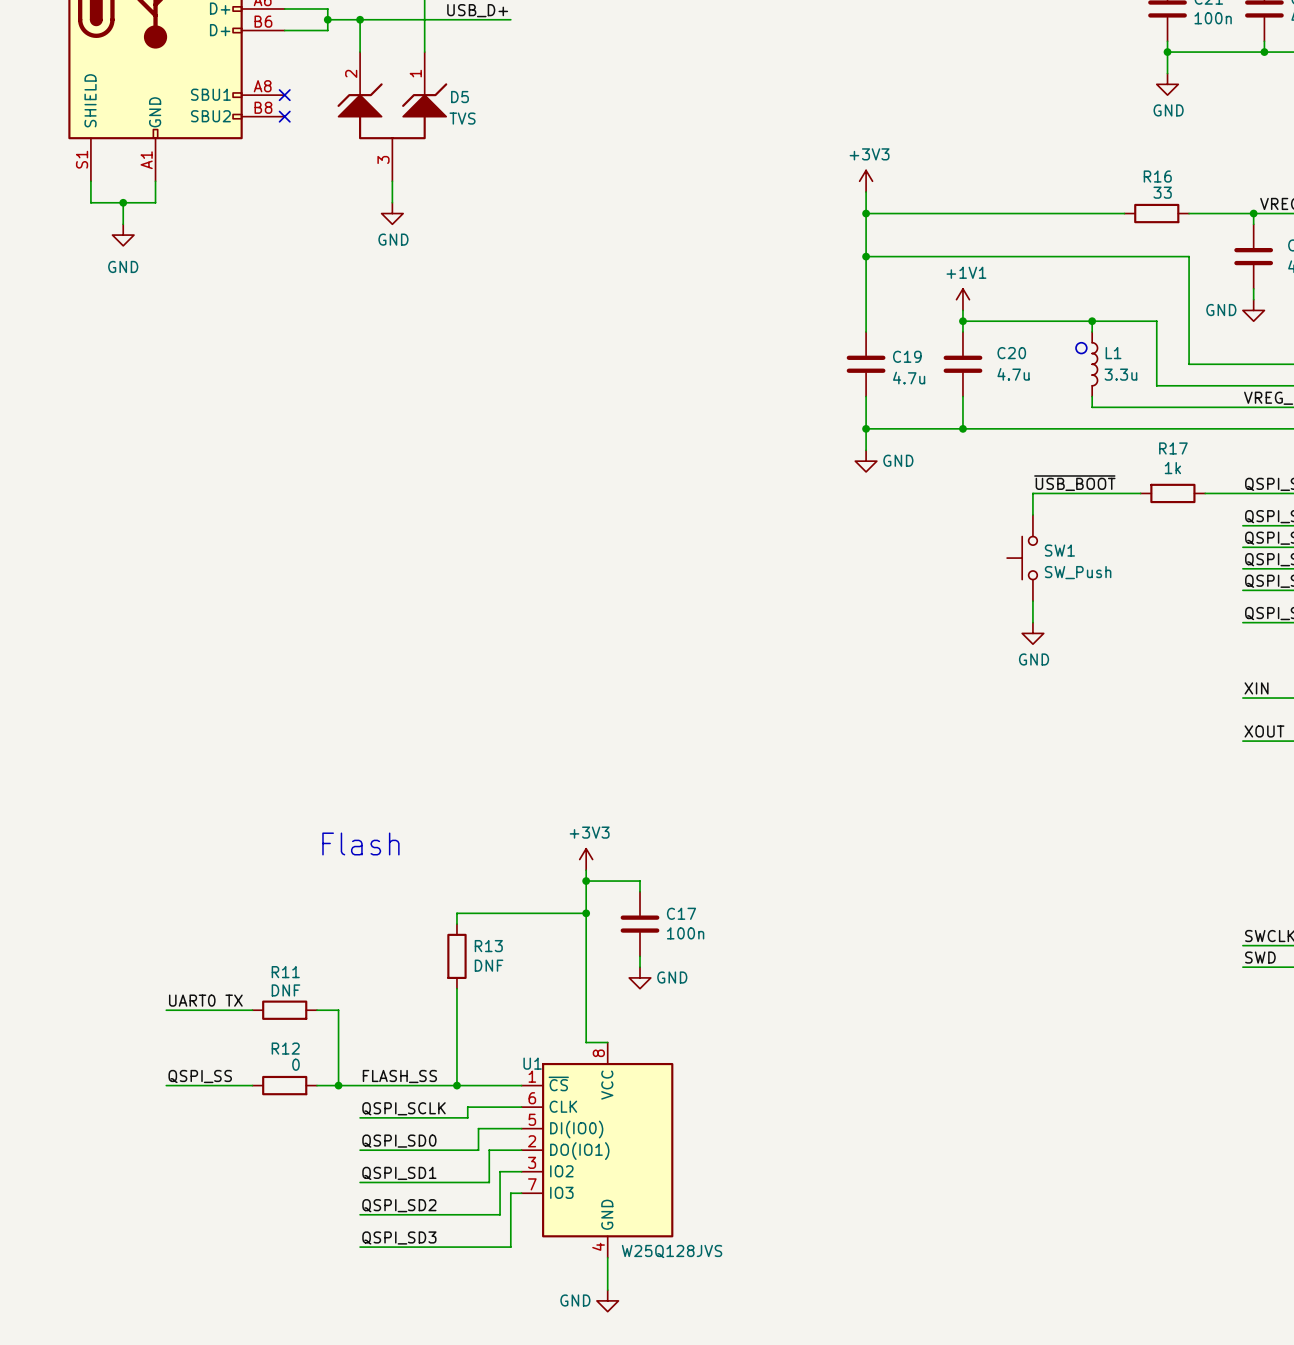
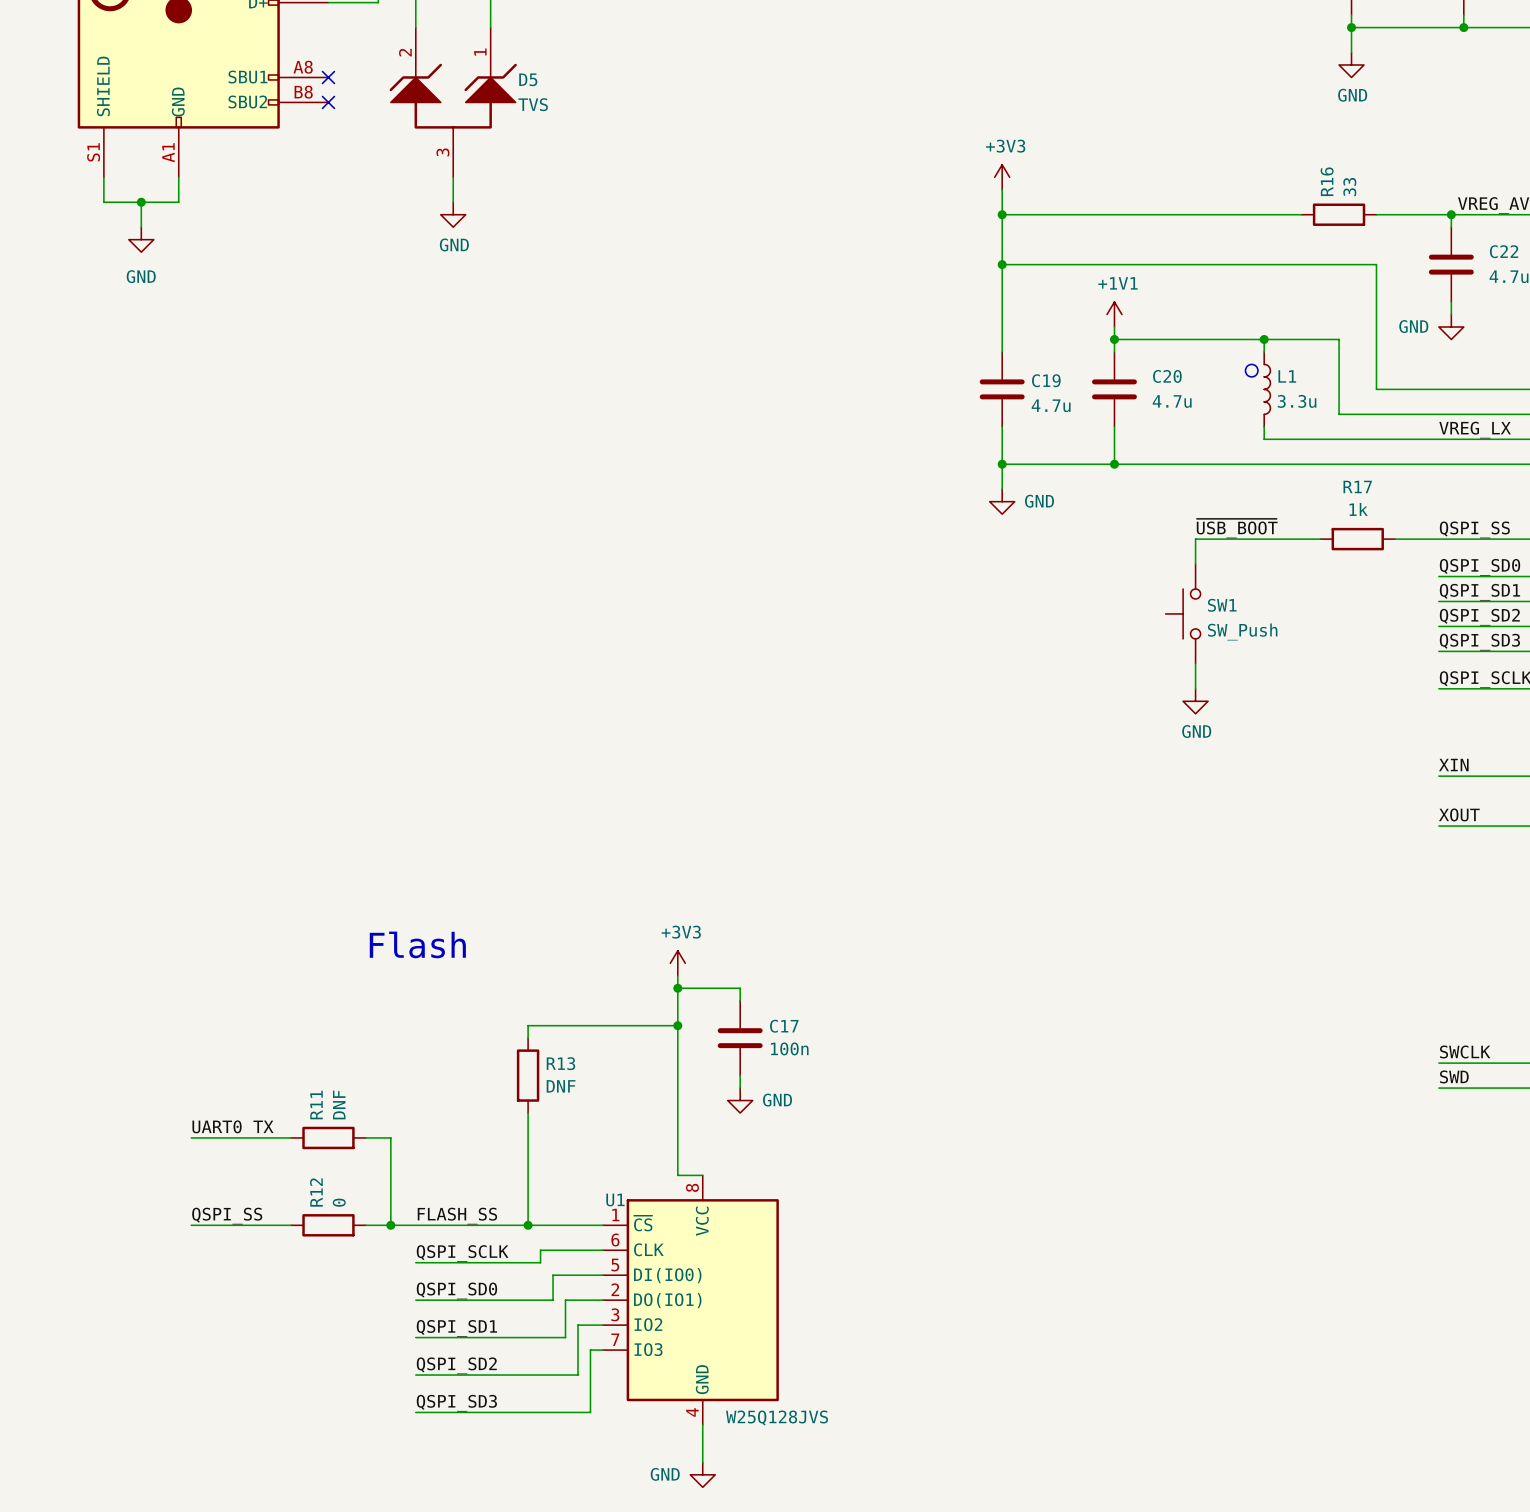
R16 name rotation: 0° (1157, 176) -> 90° counterclockwise (1327, 181)
R16 value rotation: 0° (1162, 192) -> 90° counterclockwise (1349, 187)
R11 name rotation: 0° (285, 972) -> 90° counterclockwise (316, 1105)
R11 value rotation: 0° (285, 990) -> 90° counterclockwise (339, 1104)
R12 name rotation: 0° (285, 1048) -> 90° counterclockwise (316, 1192)
R12 value rotation: 0° (295, 1064) -> 90° counterclockwise (339, 1202)

